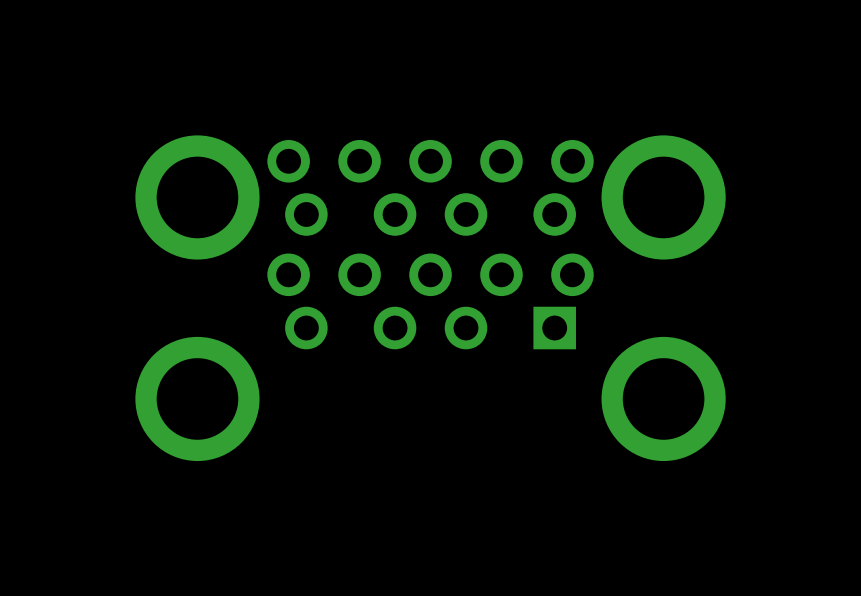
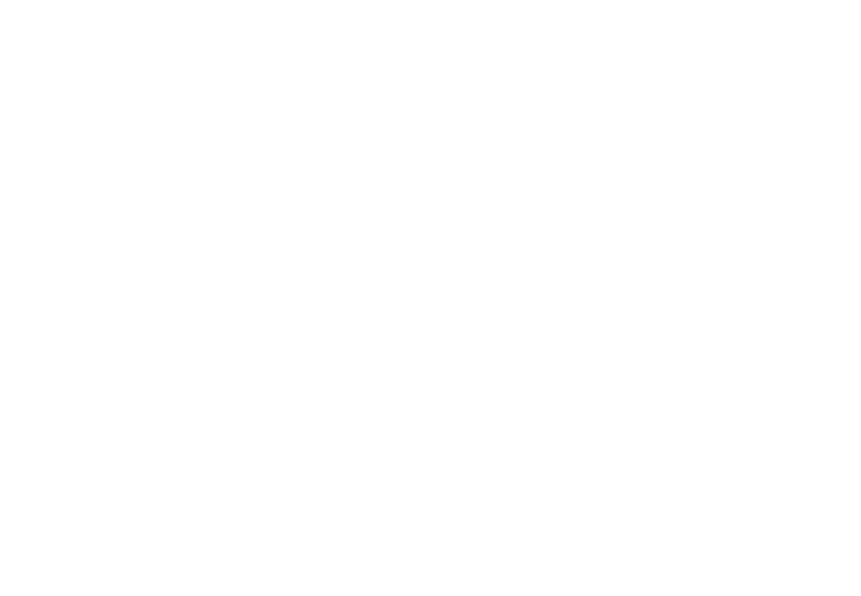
part: (430, 298) -> none

